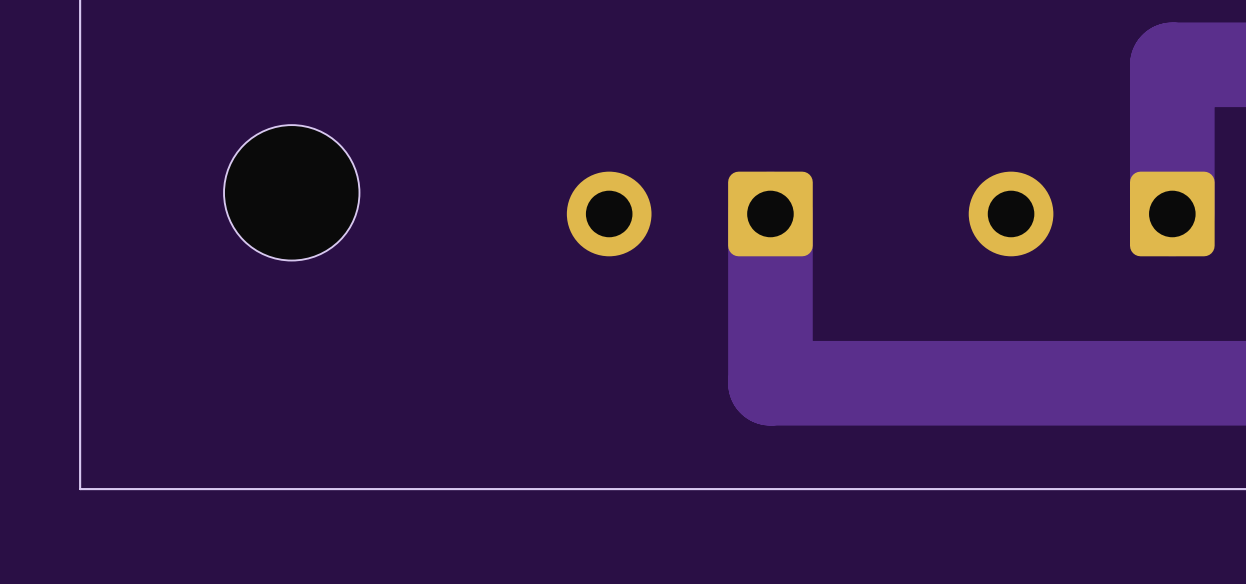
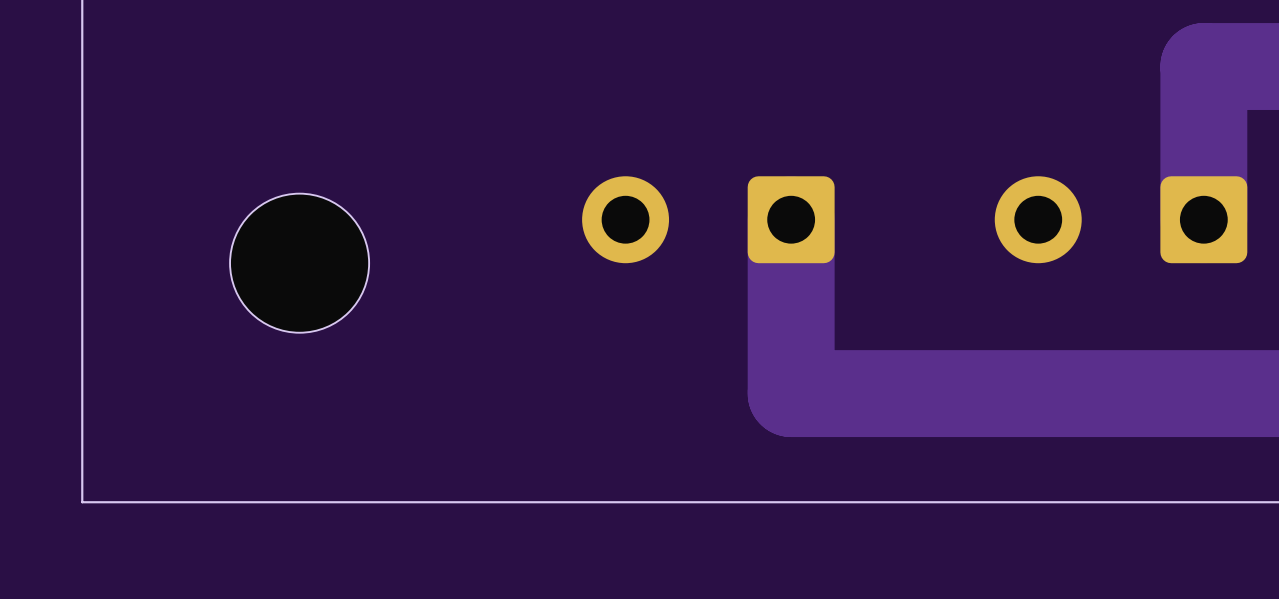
part position: (291, 192) -> (299, 263)

